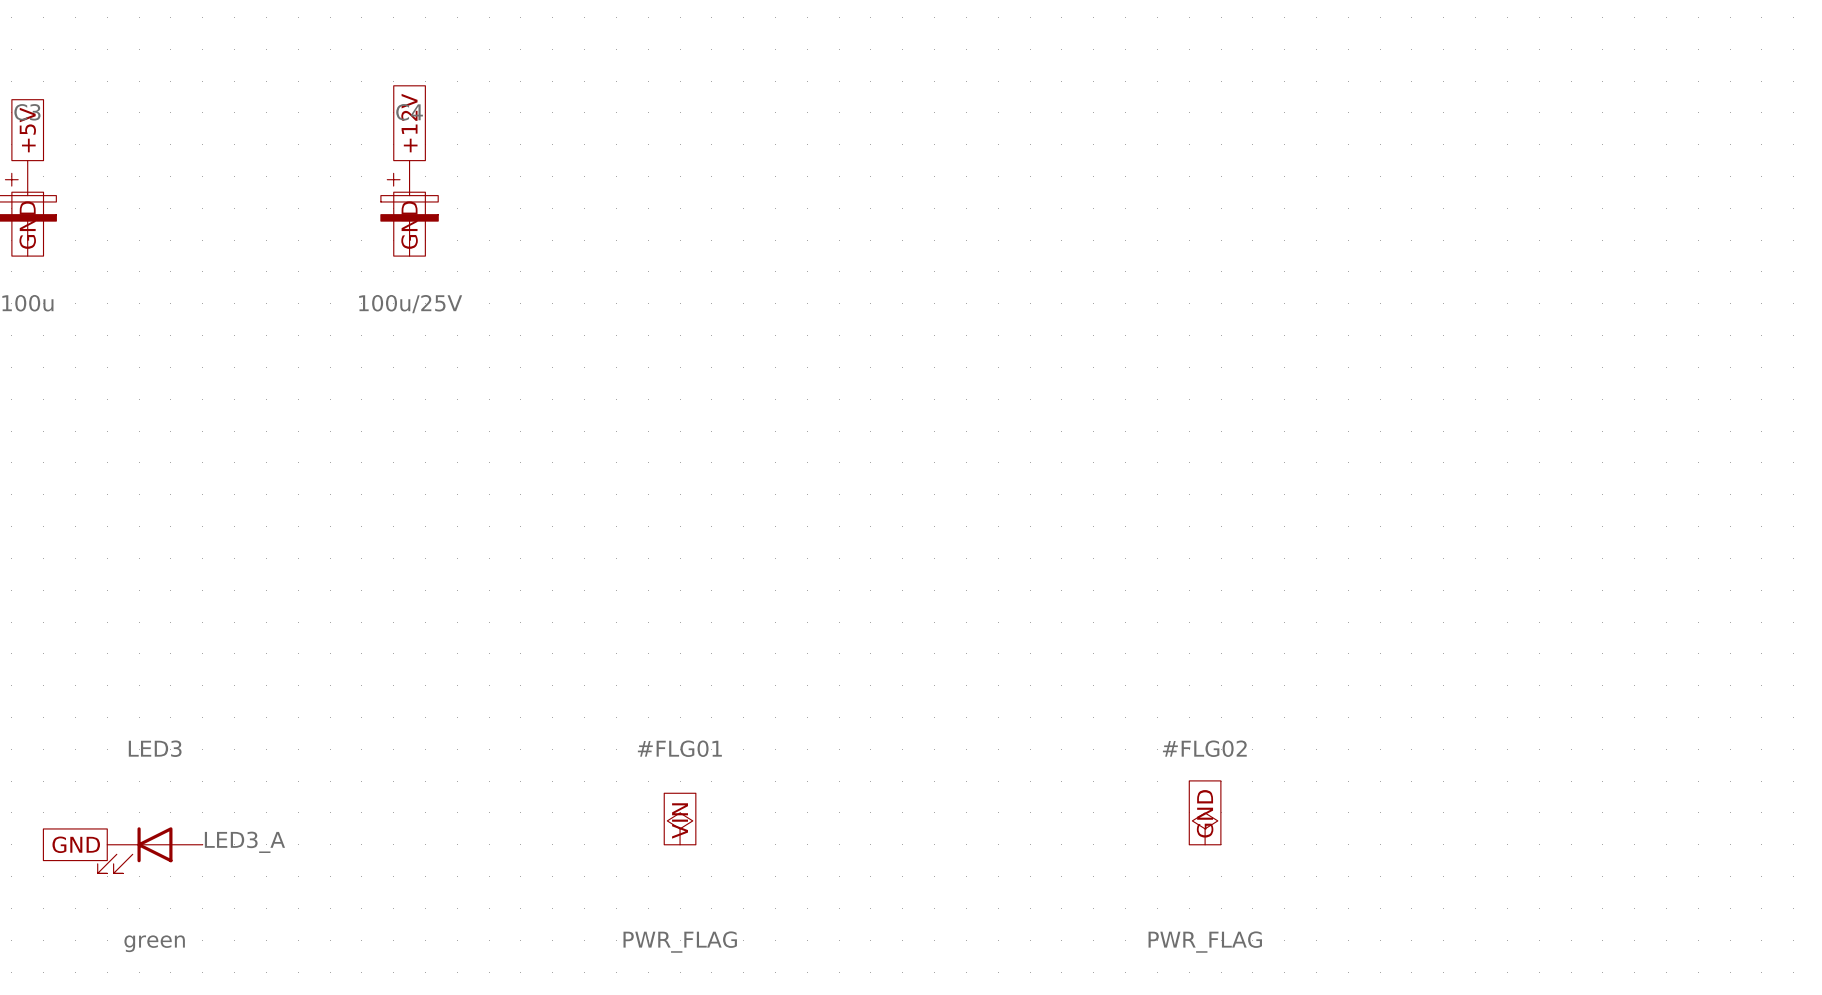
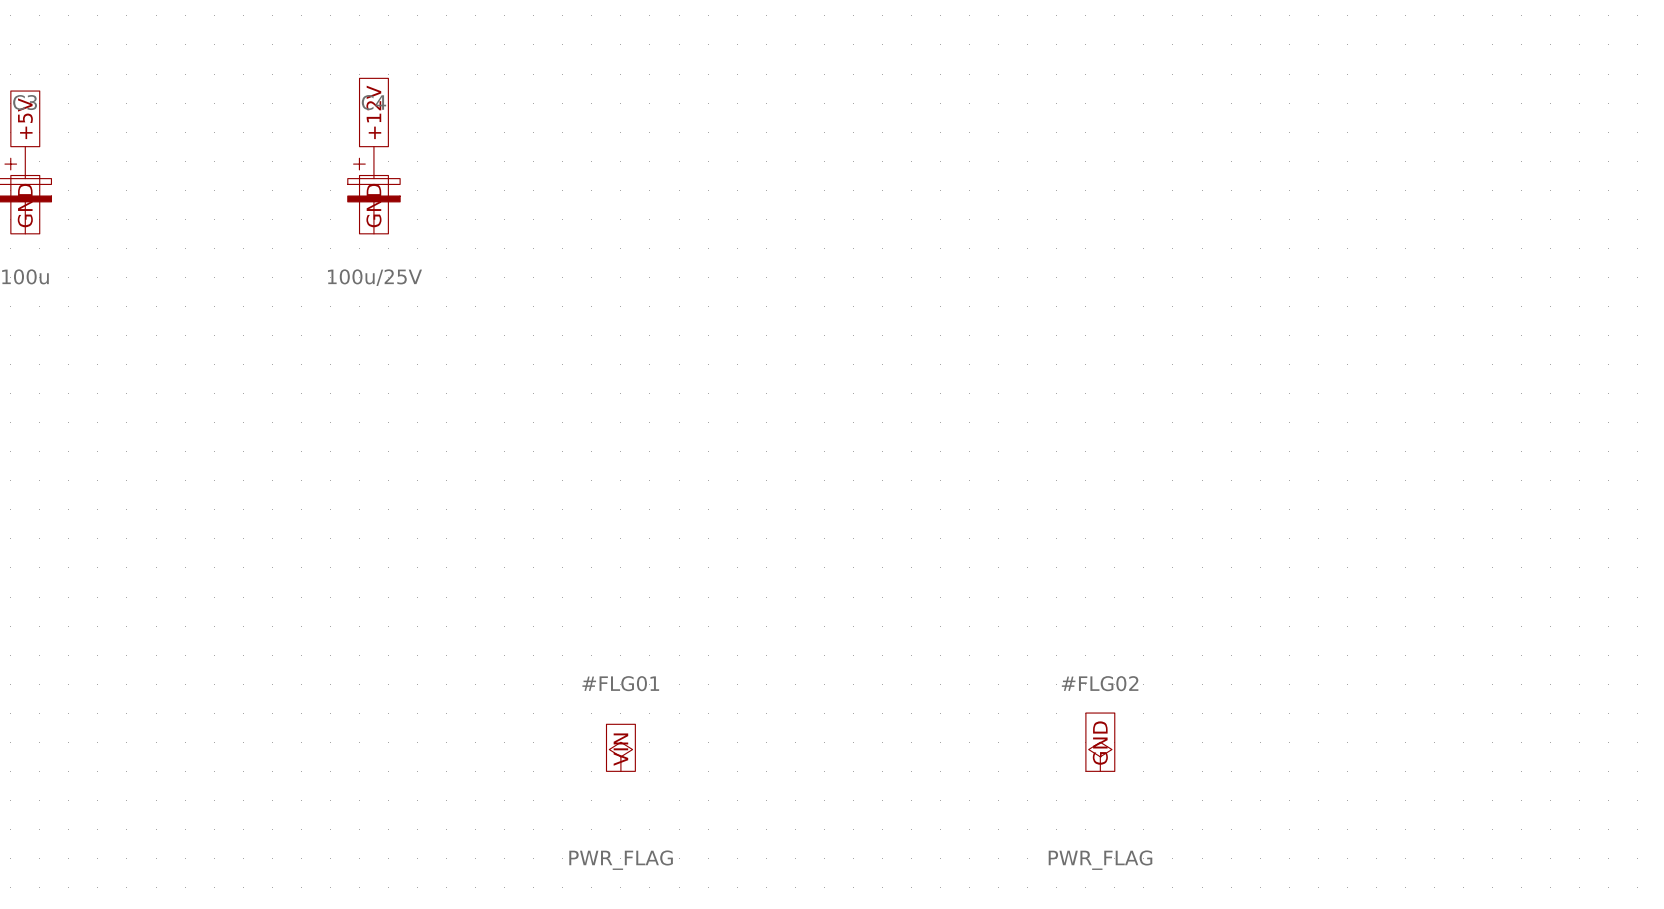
label: LED3_A (244, 842) -> none
global label: GND (76, 844) -> none
LED3: green (150, 850) -> none

